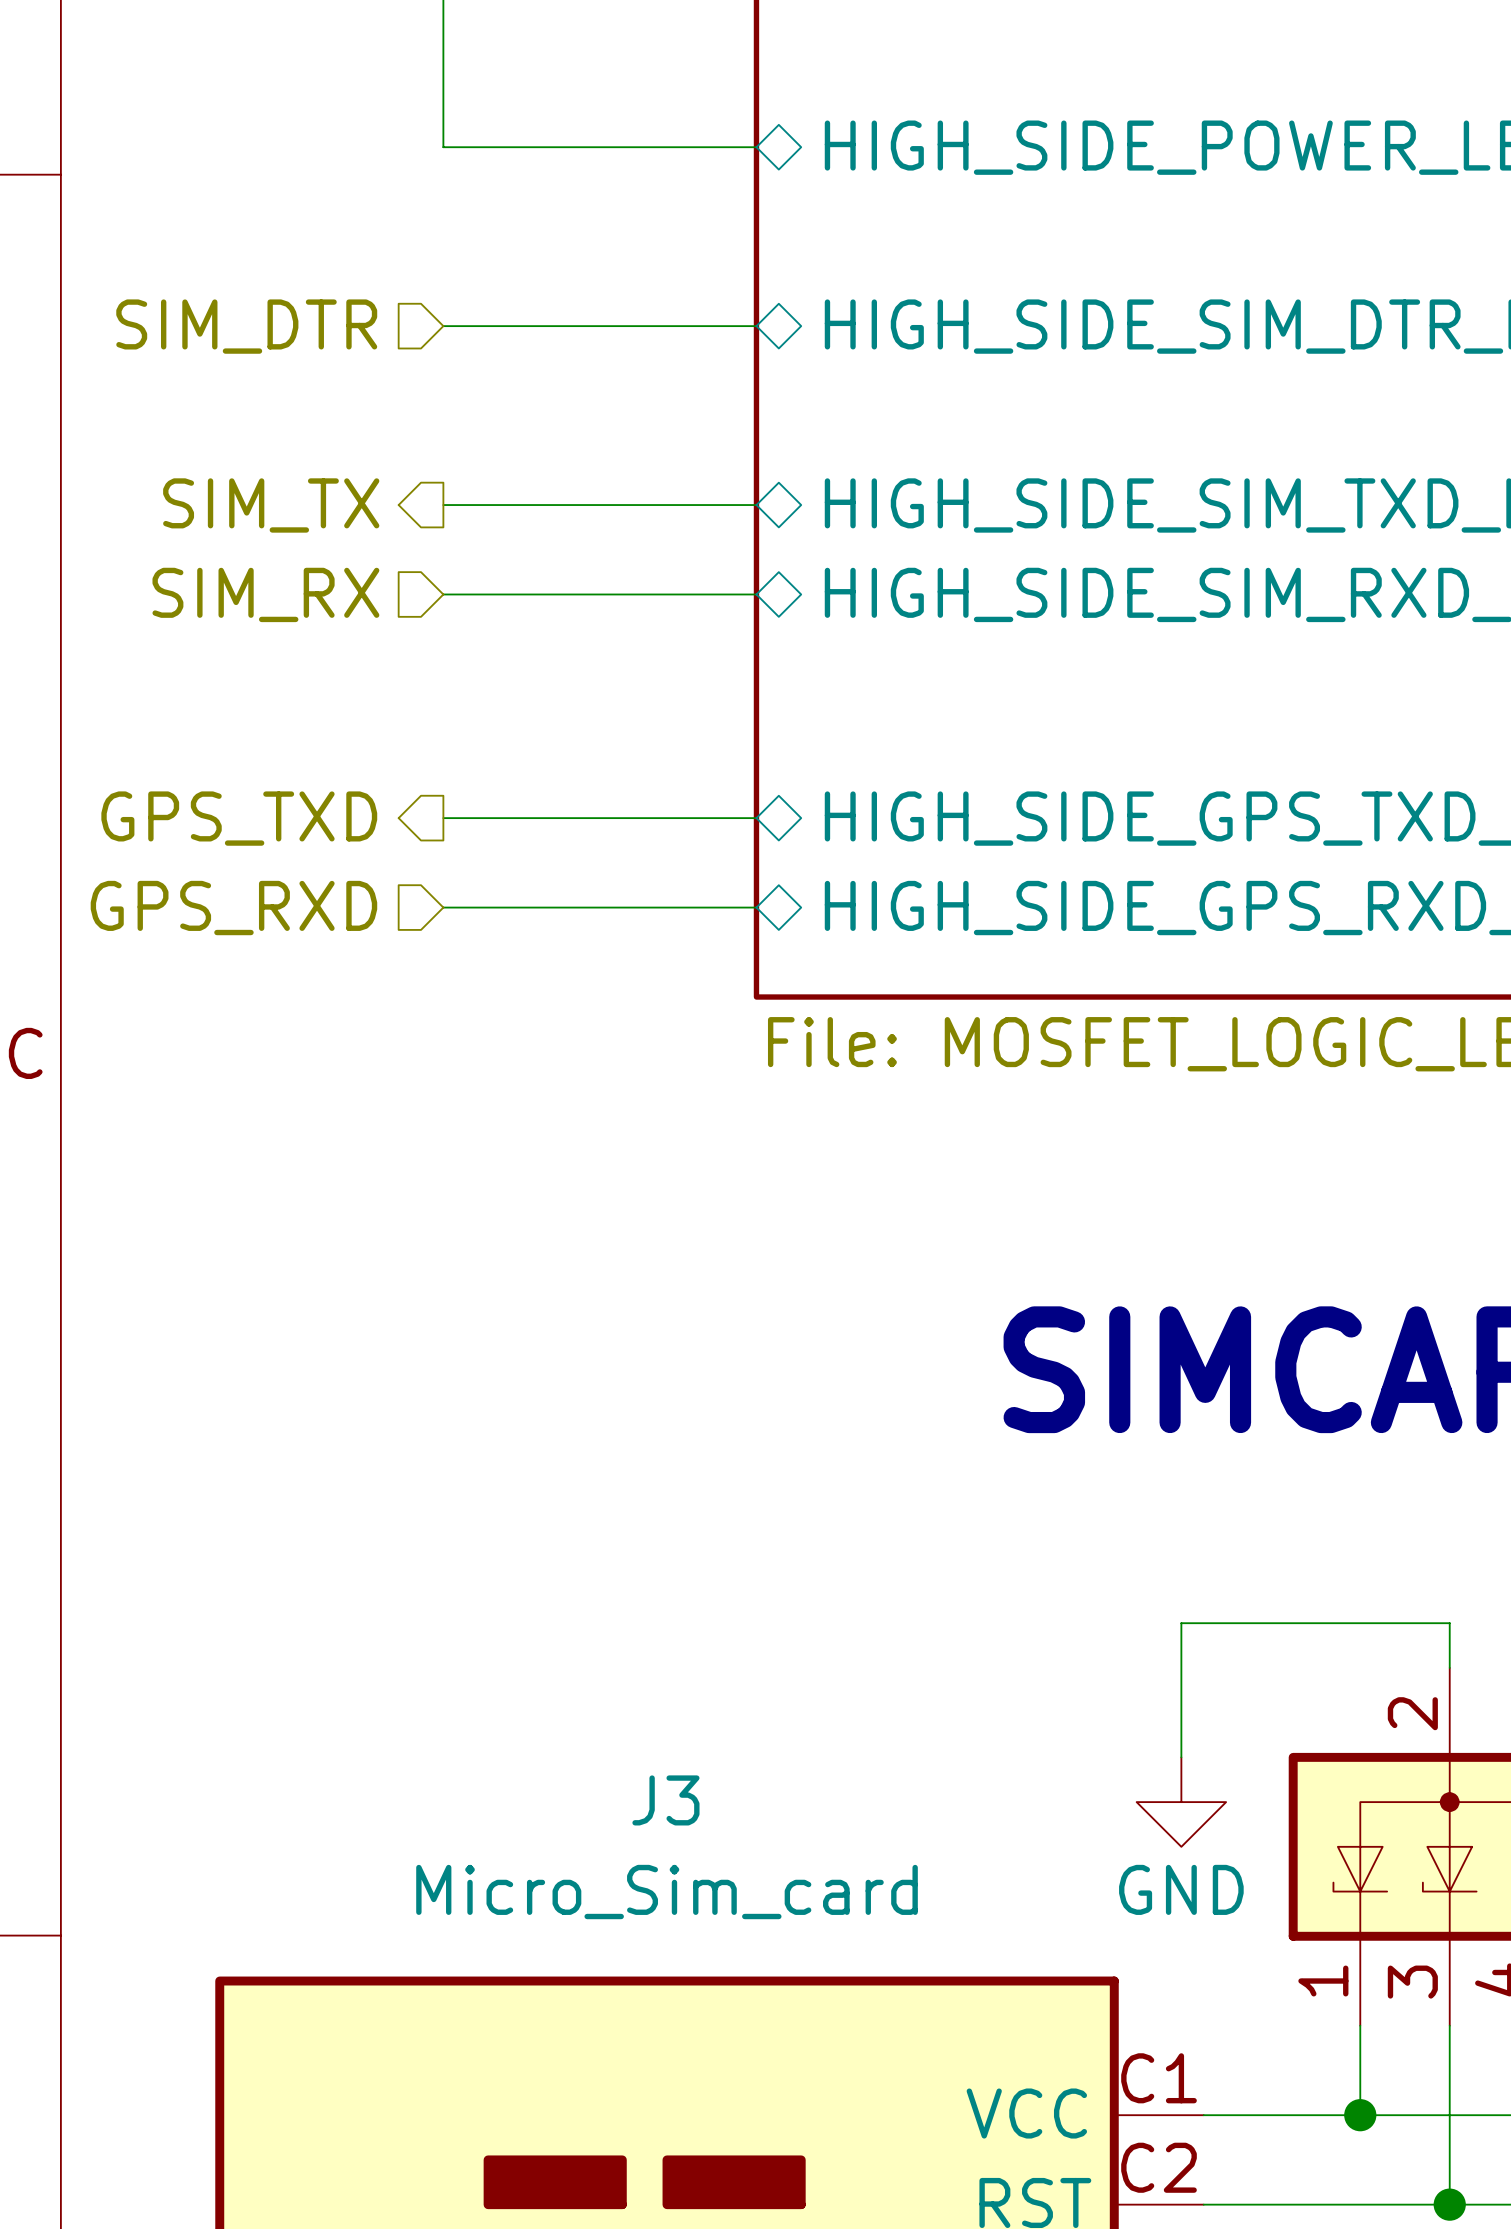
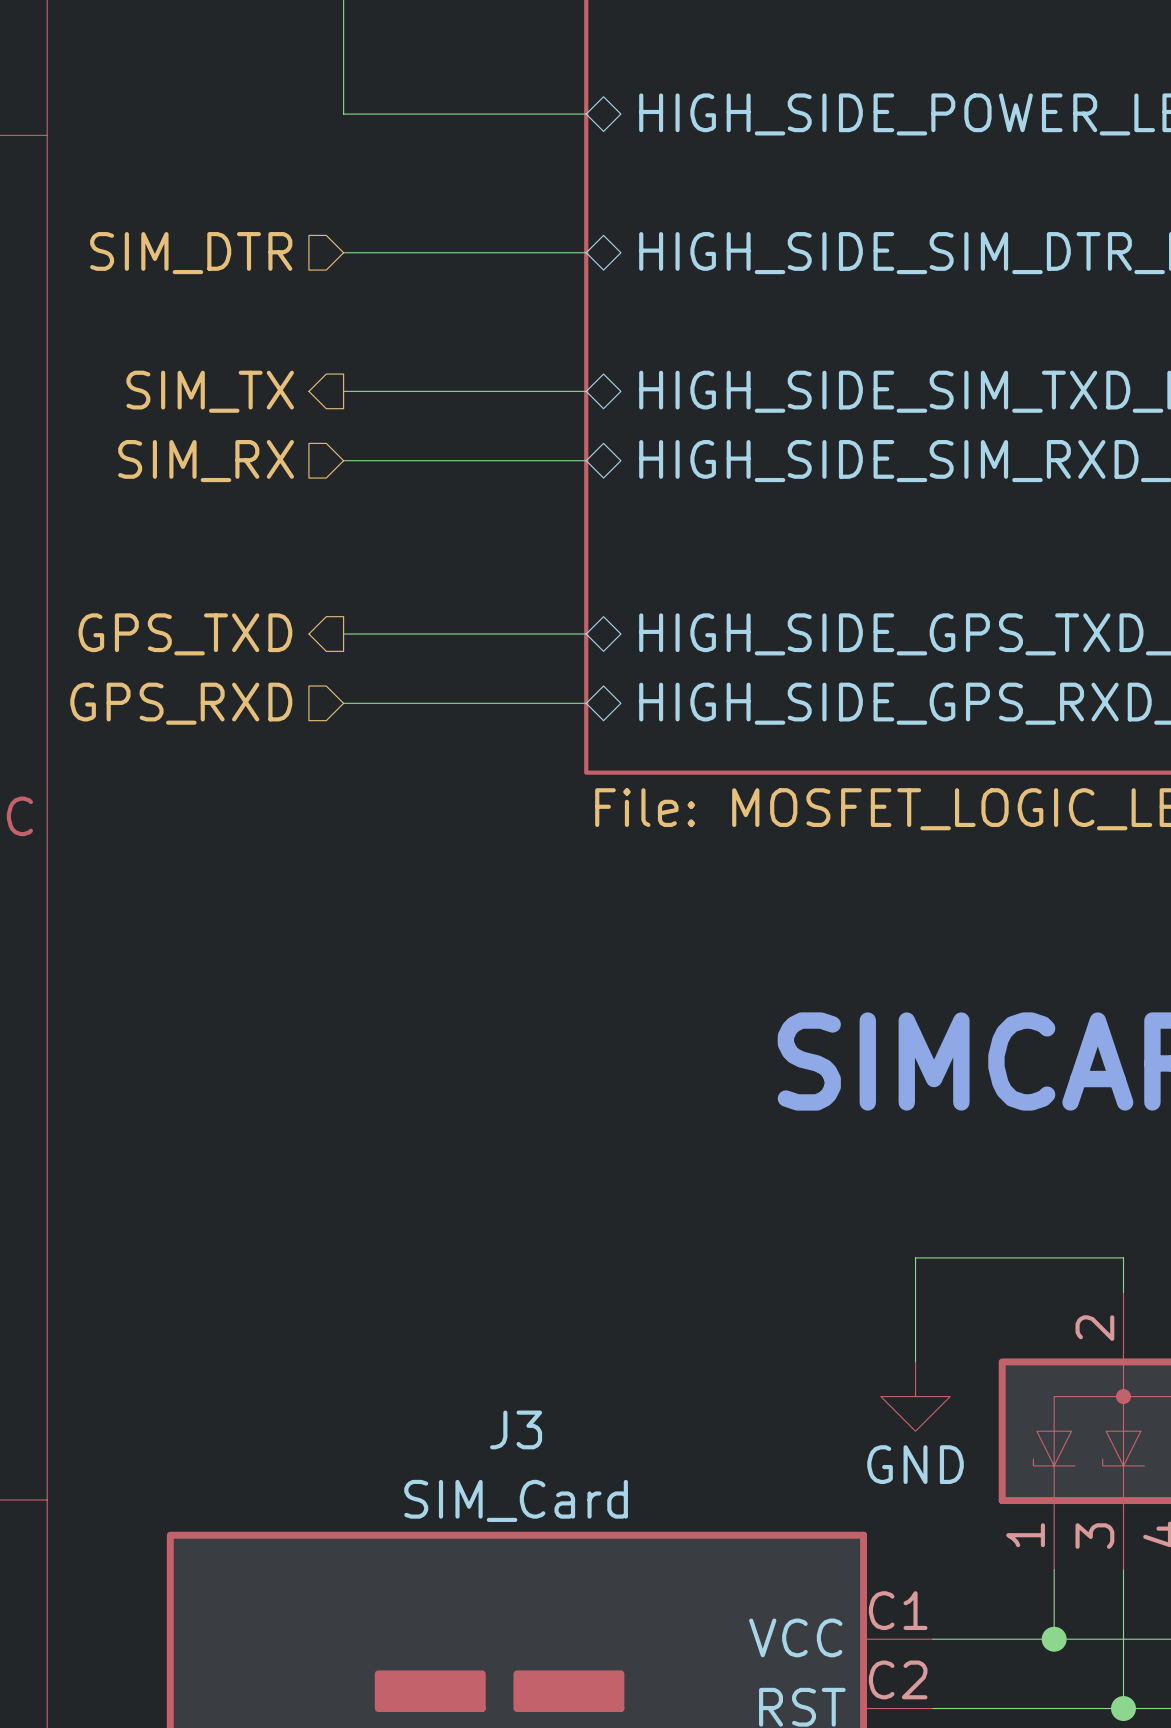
J3 name position: J3 (665, 1800) -> J3 (516, 1429)
J3 value: Micro_Sim_card (667, 1892) -> SIM_Card (516, 1500)

